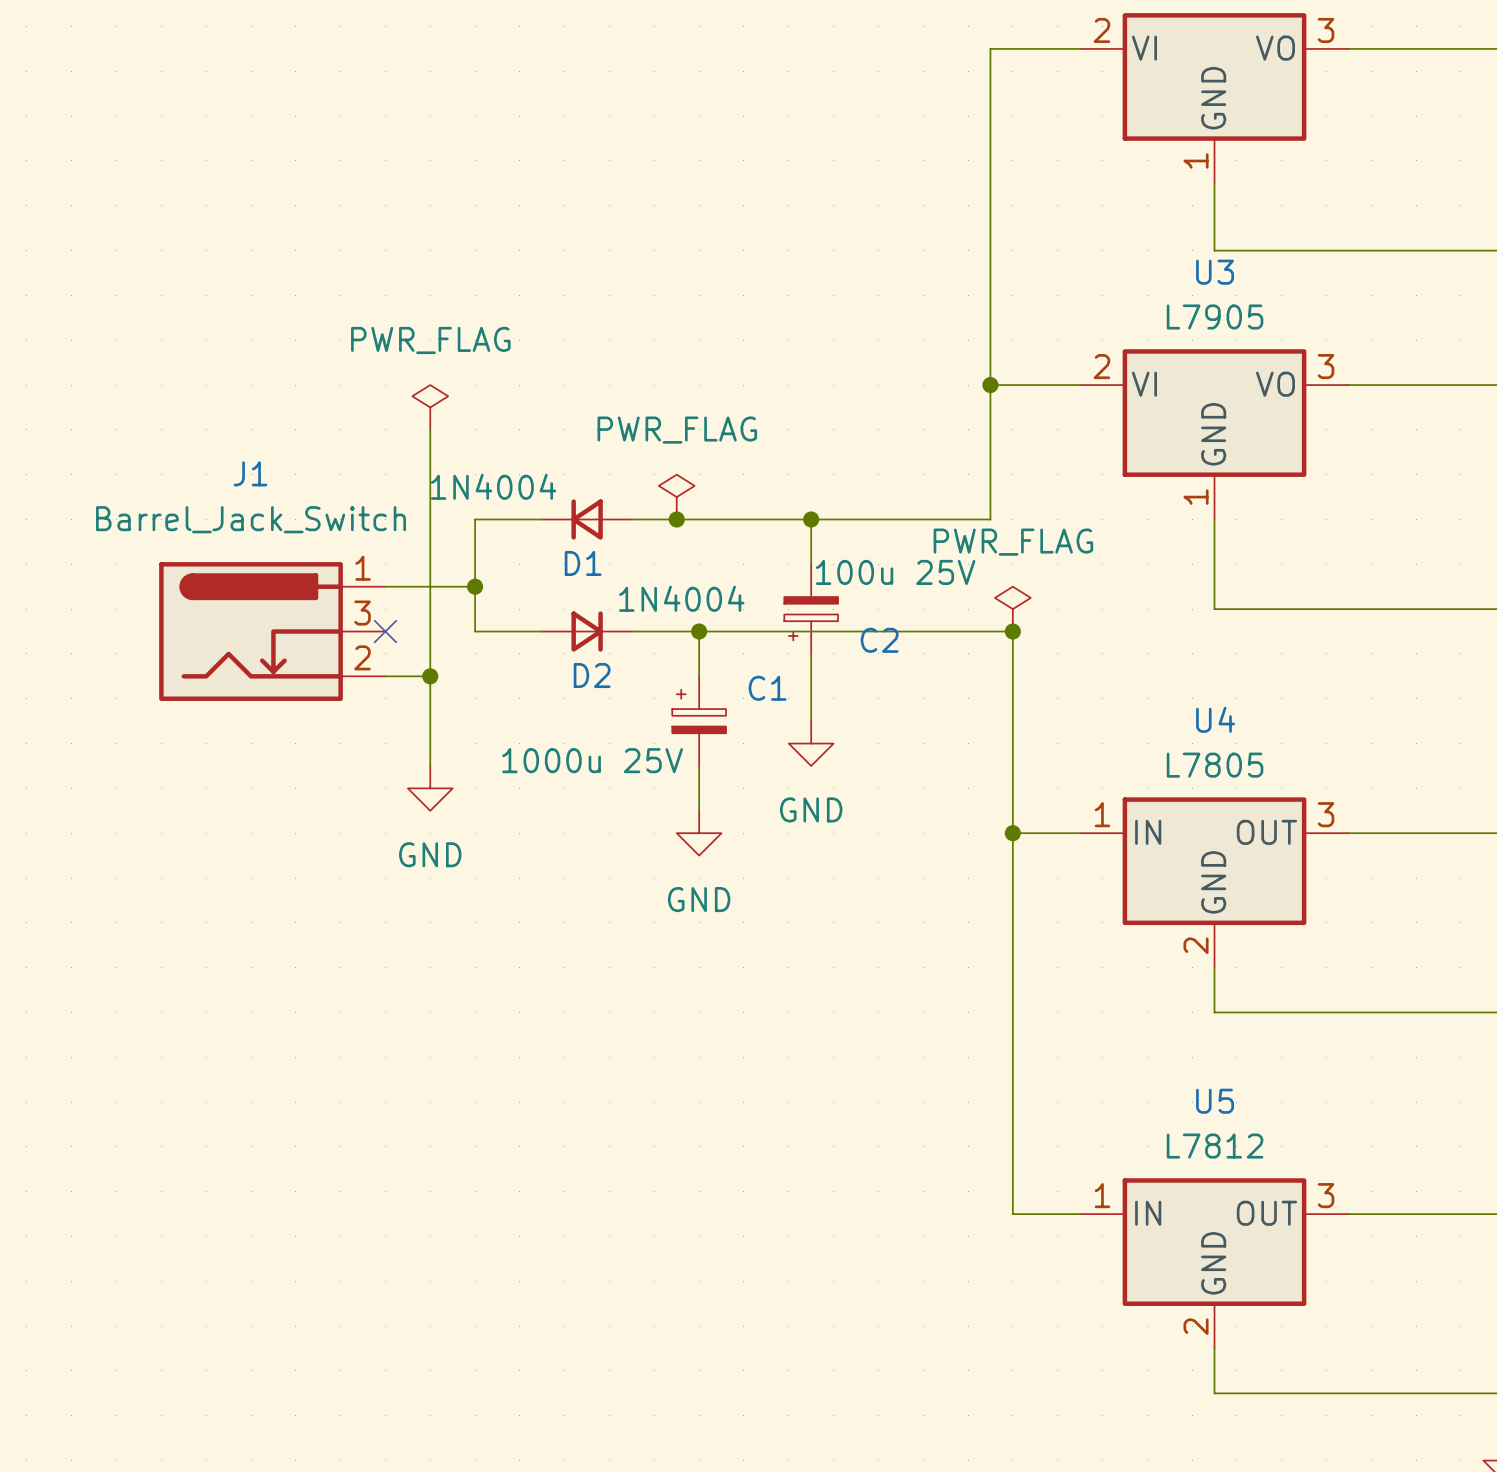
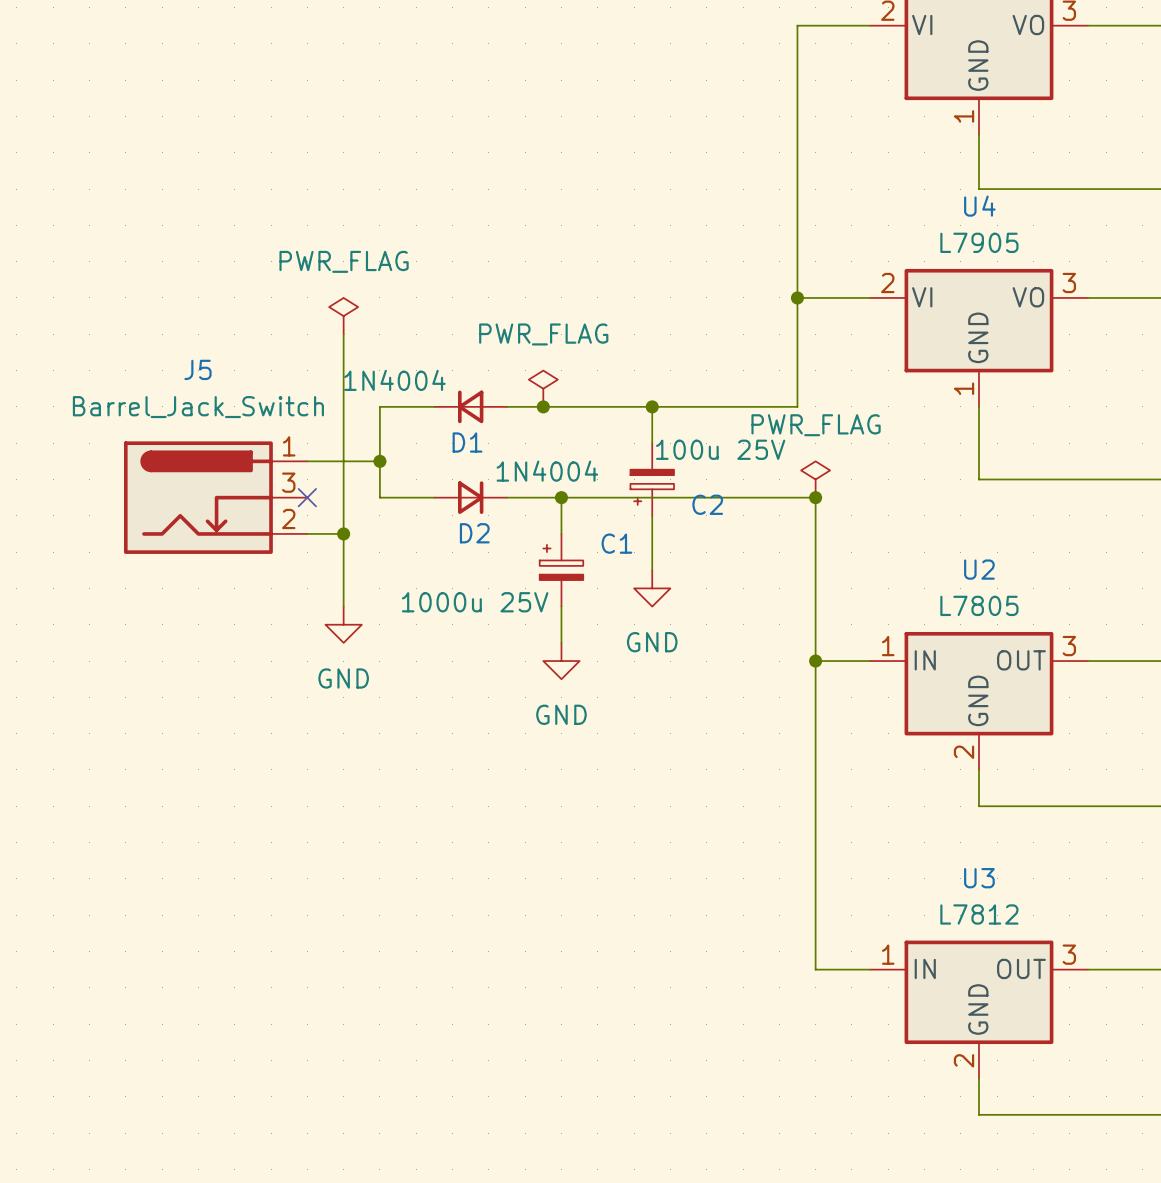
U3 name: U3 (1215, 272) -> U4 (979, 206)
J1 name: J1 (250, 473) -> J5 (197, 369)
U4 name: U4 (1215, 719) -> U2 (979, 569)
U5 name: U5 (1215, 1101) -> U3 (979, 878)

